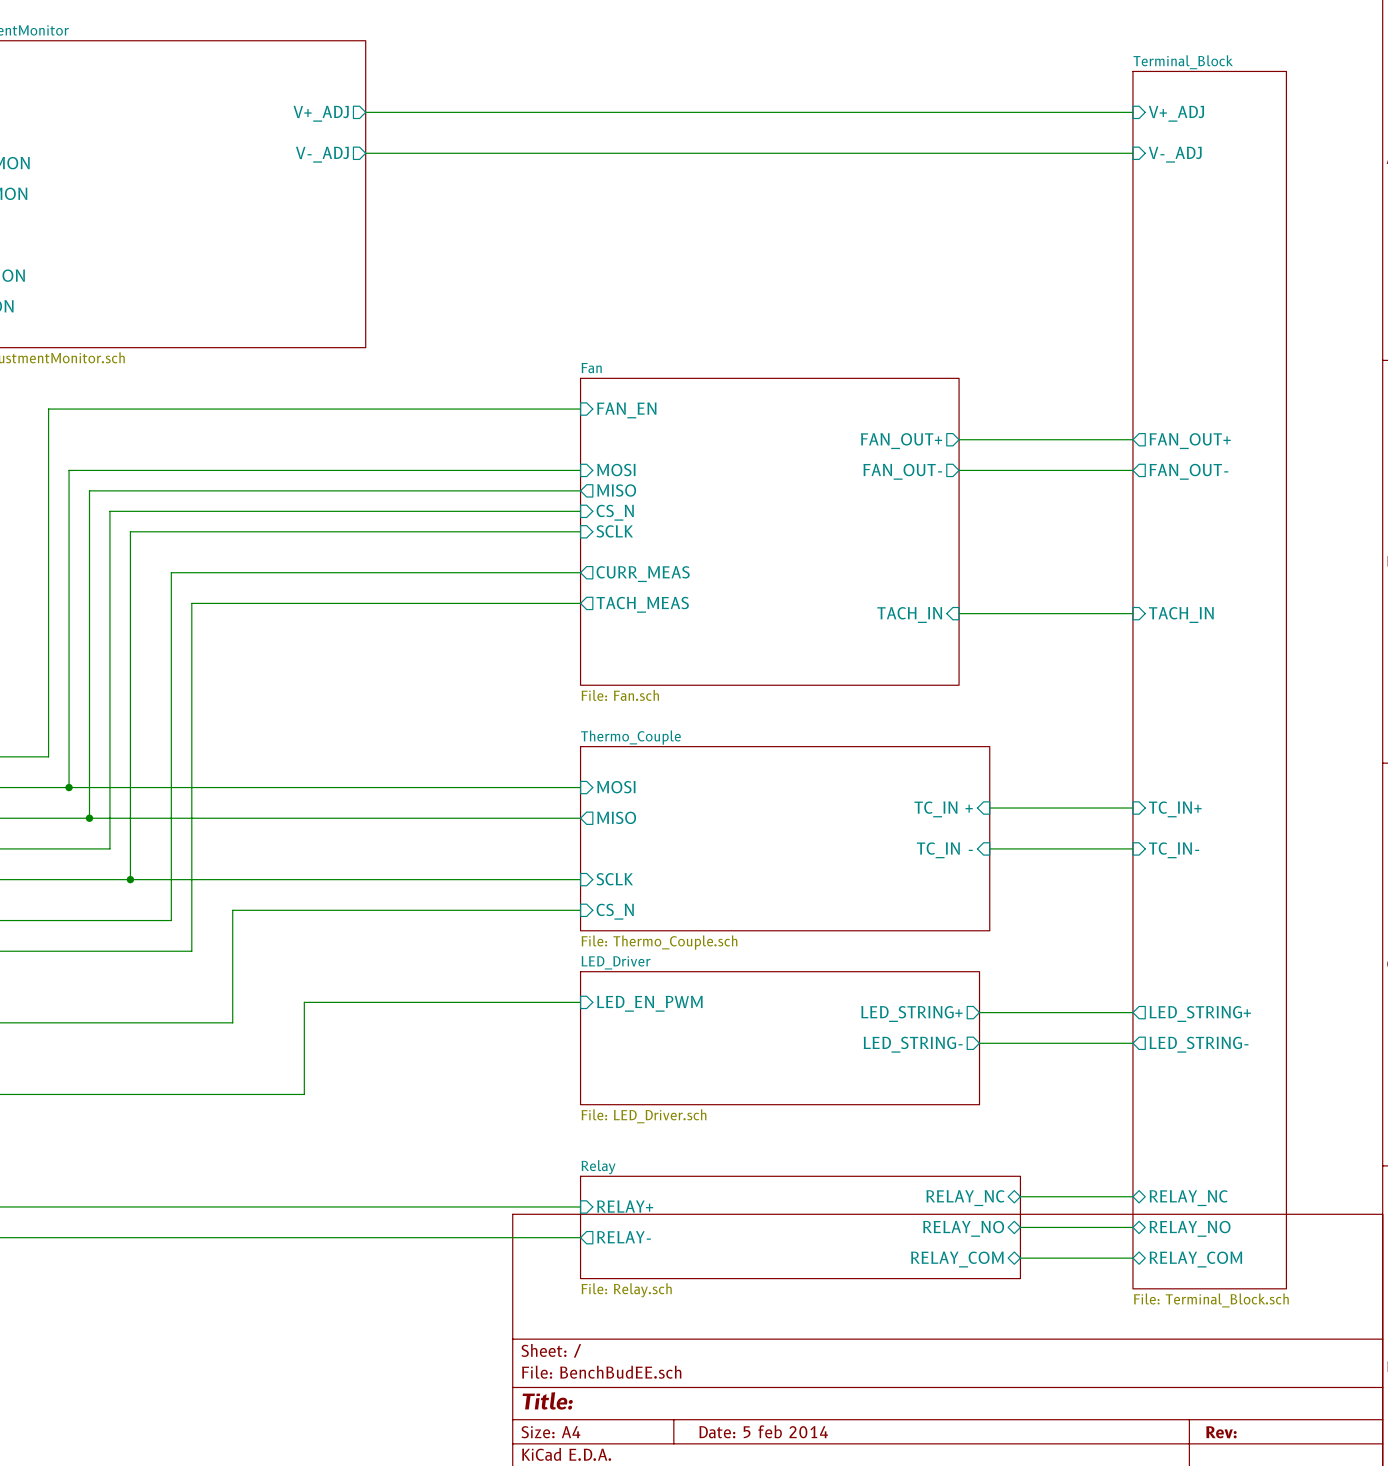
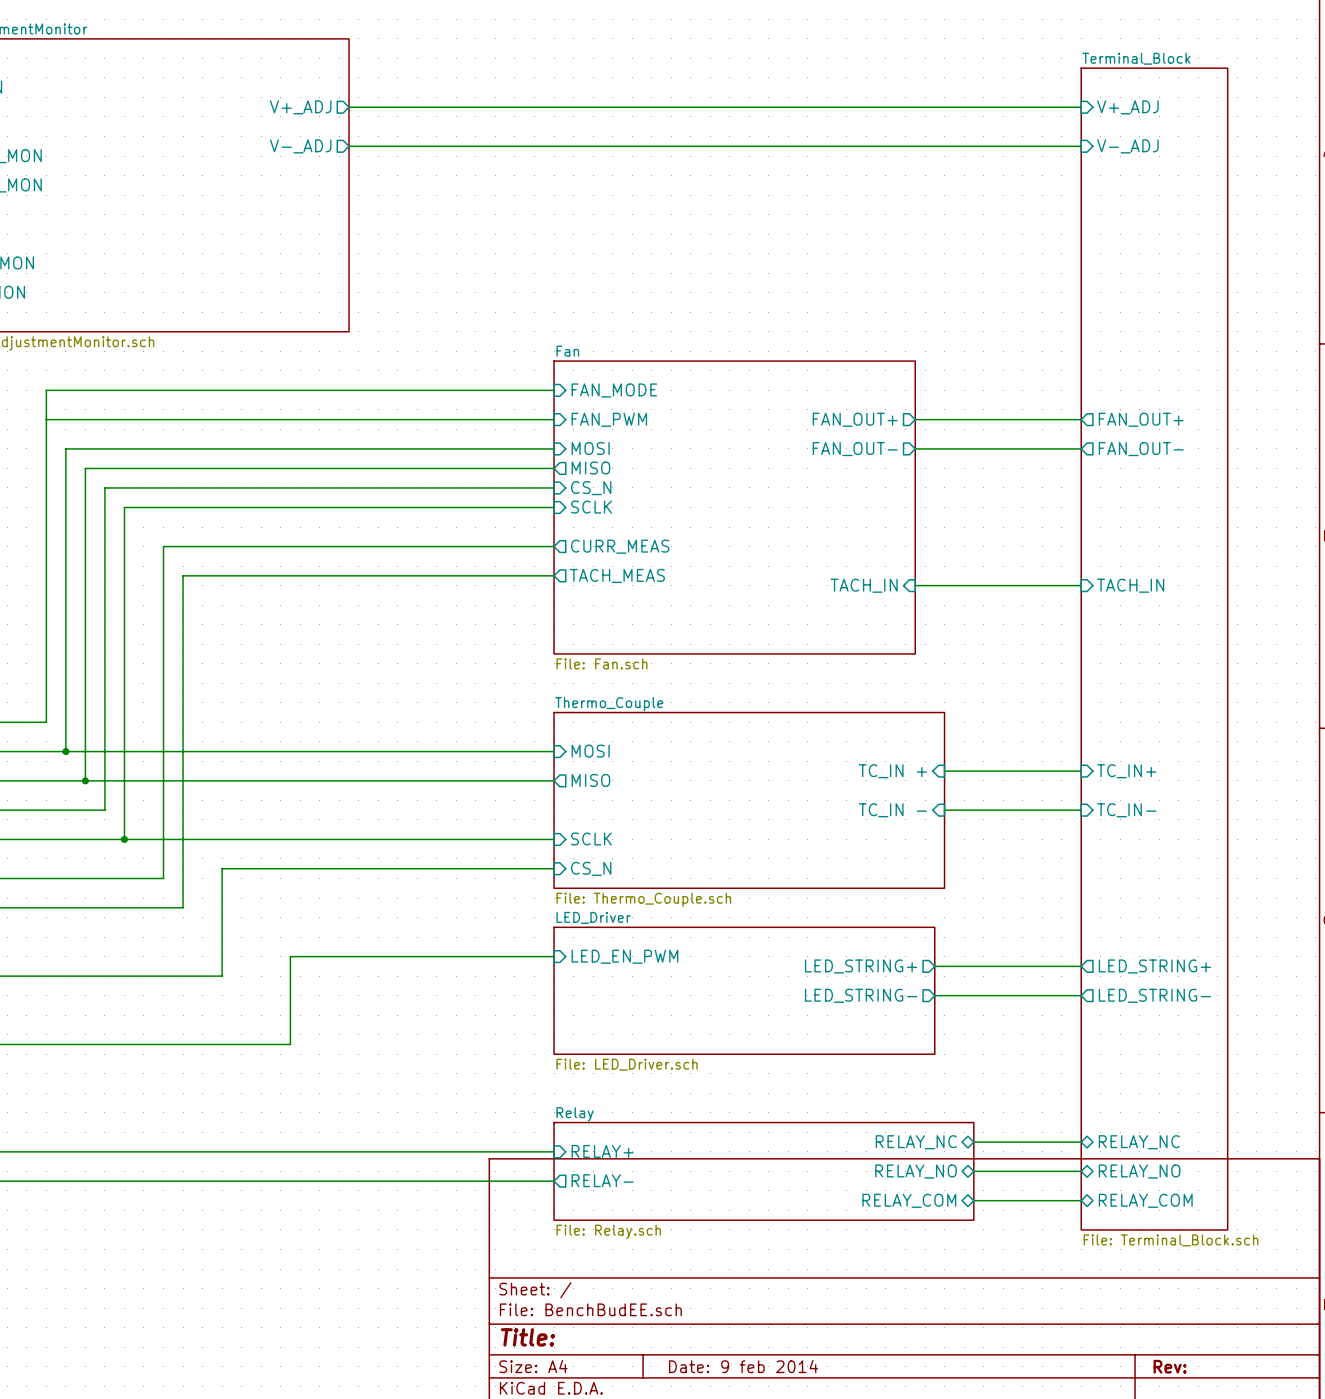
sheet pin: FAN_EN (626, 410) -> FAN_MODE (614, 390)
wire: none -> (46, 419) (554, 419)
sheet pin: none -> FAN_PWM (609, 419)
title block: Date: 5 feb 2014 (763, 1431) -> Date: 9 feb 2014 (743, 1366)

